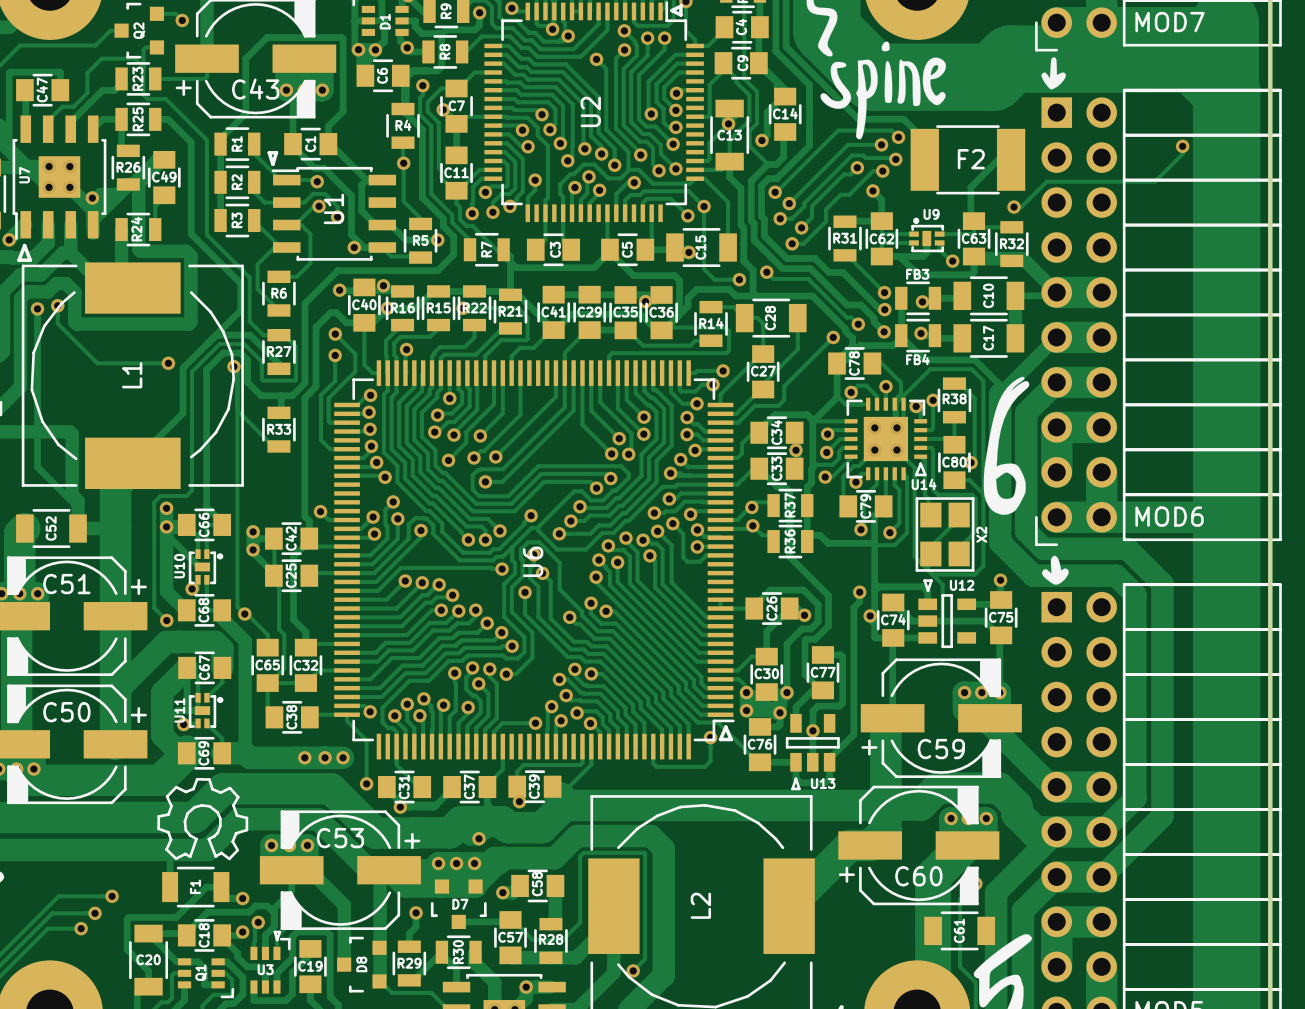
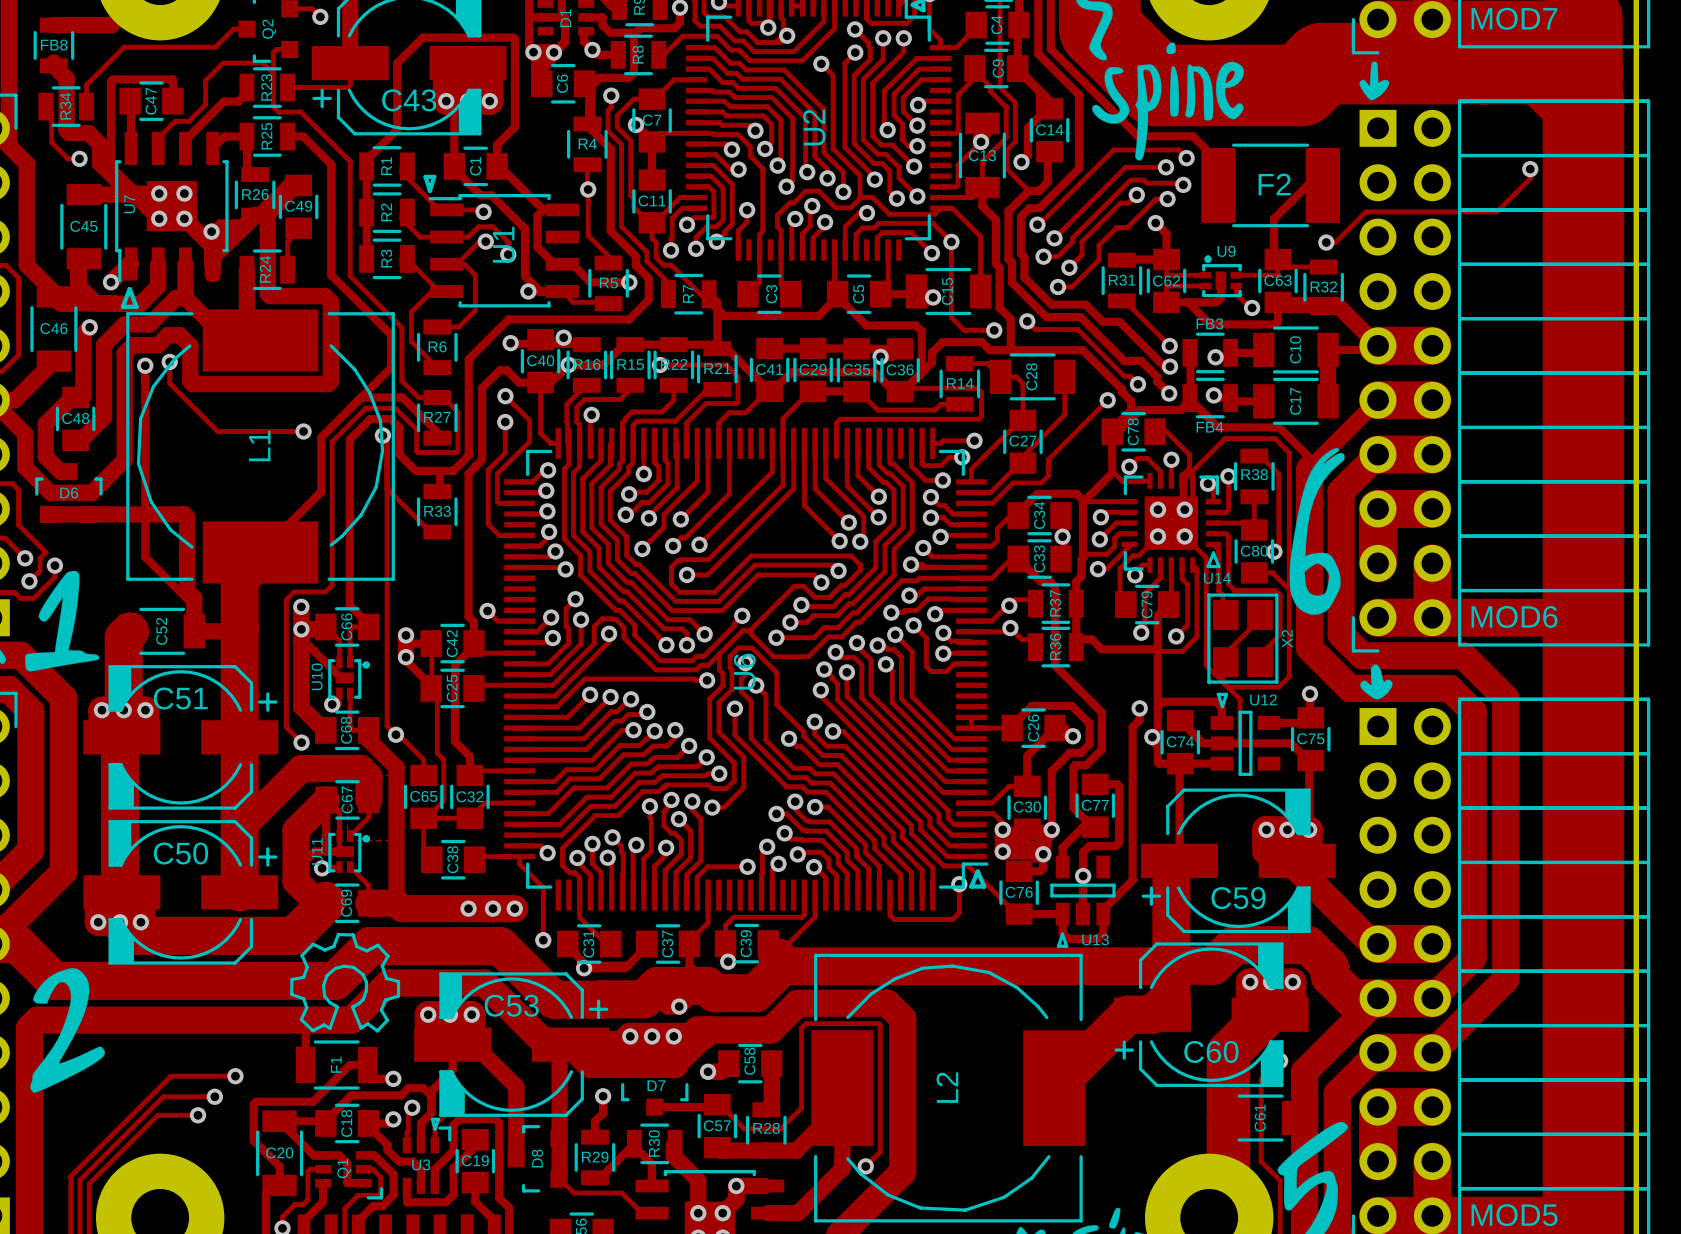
zone outline: none -> (347, 775) (347, 840) (391, 840) (391, 775) (347, 775)

